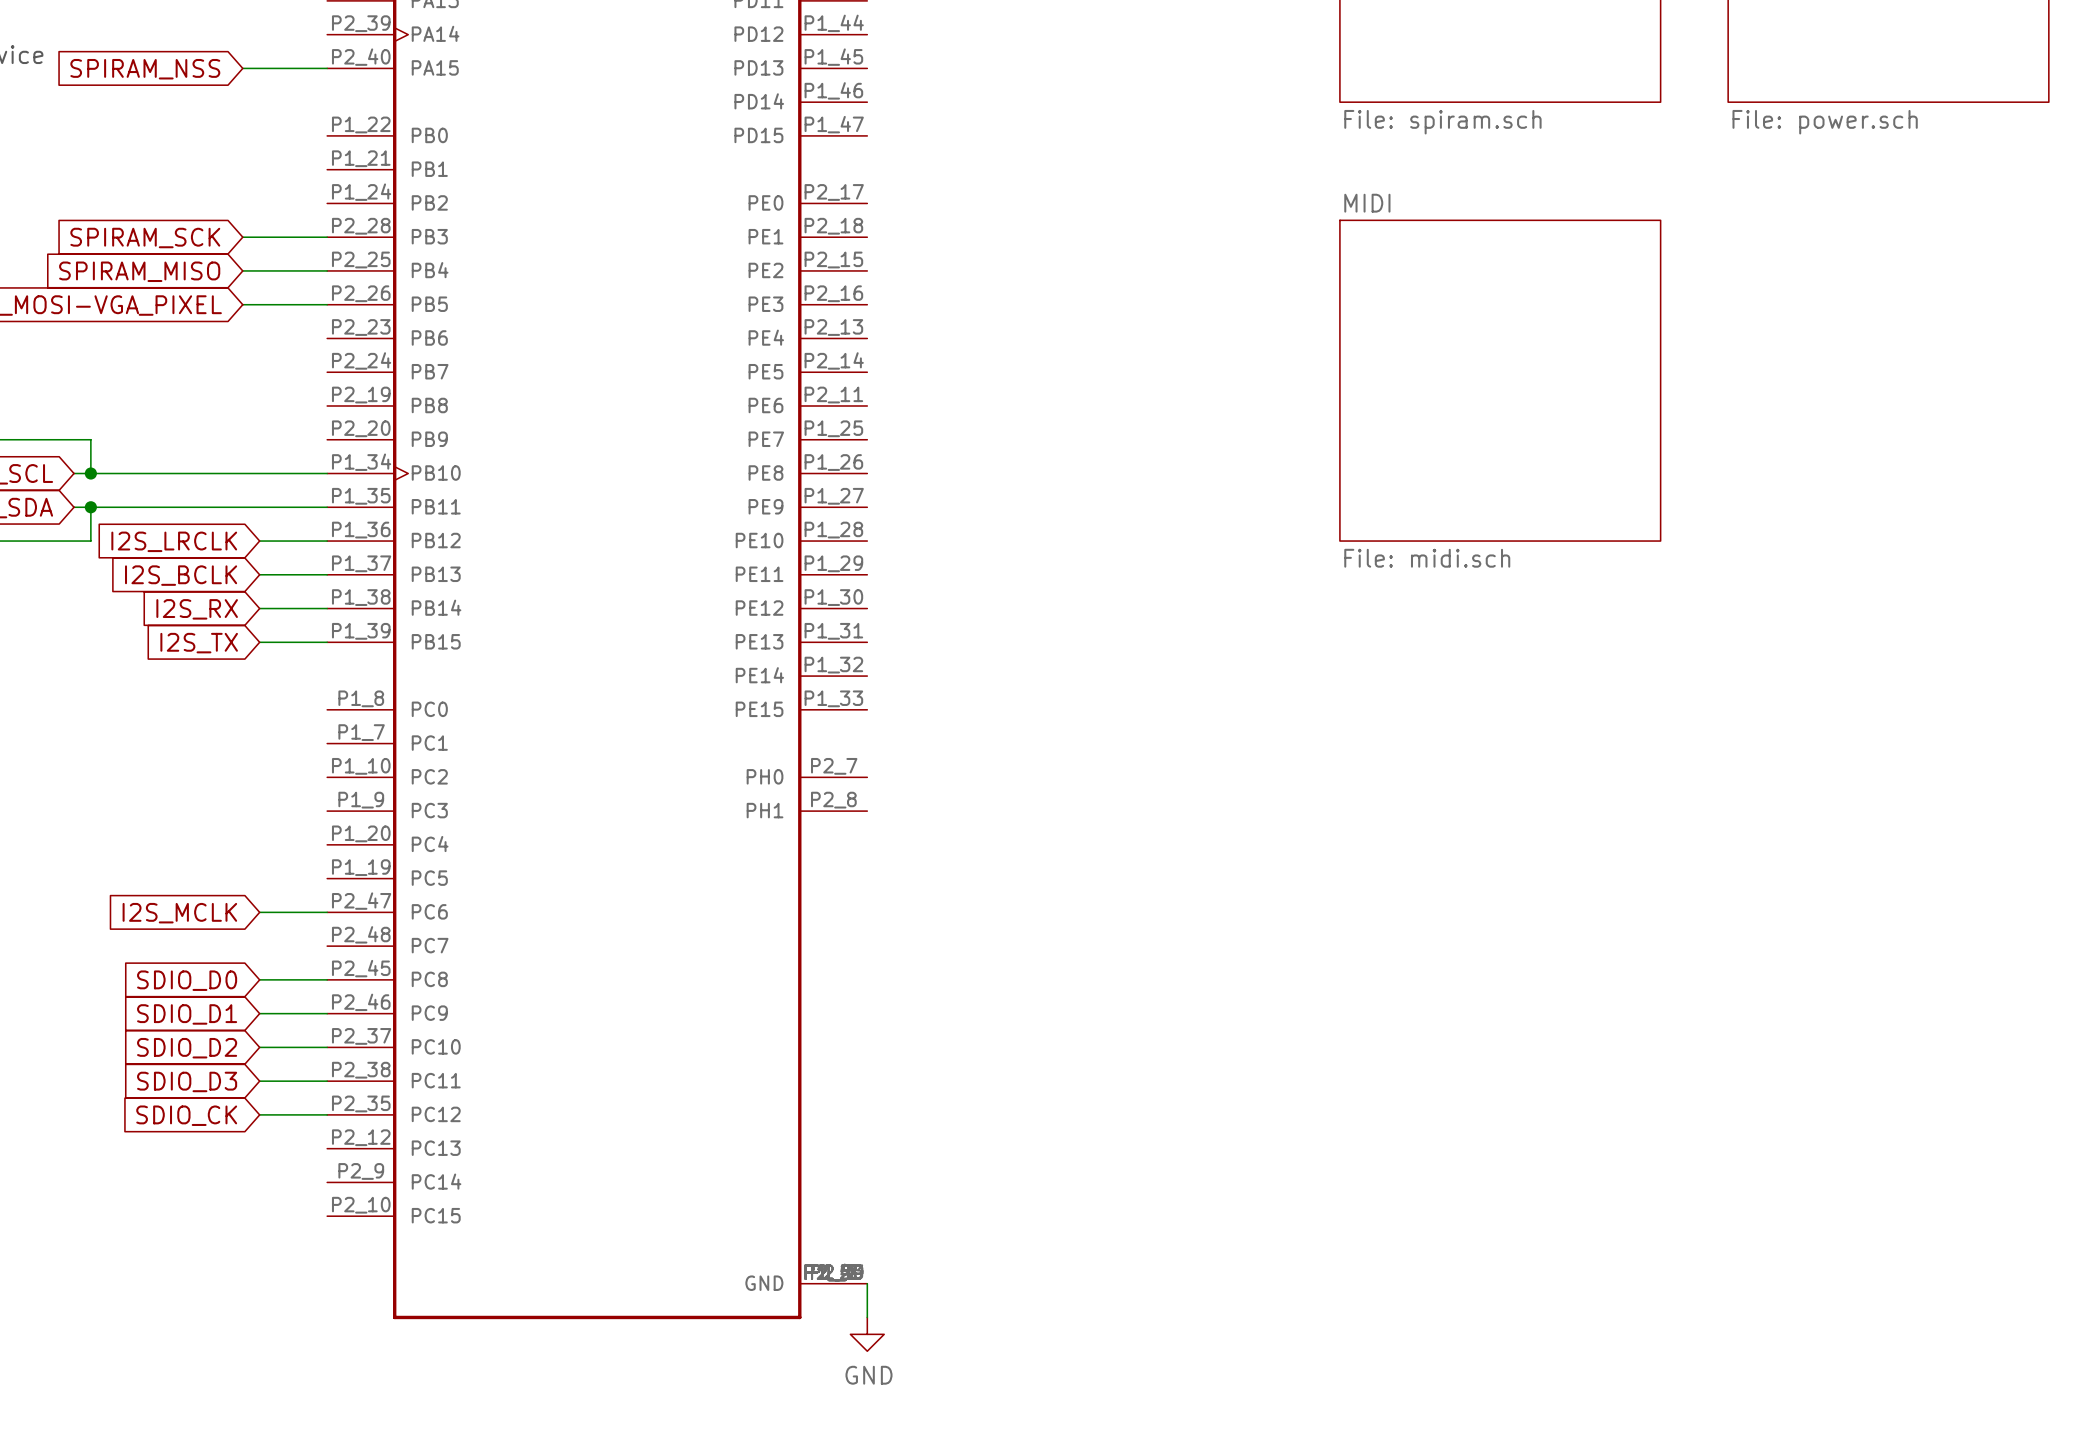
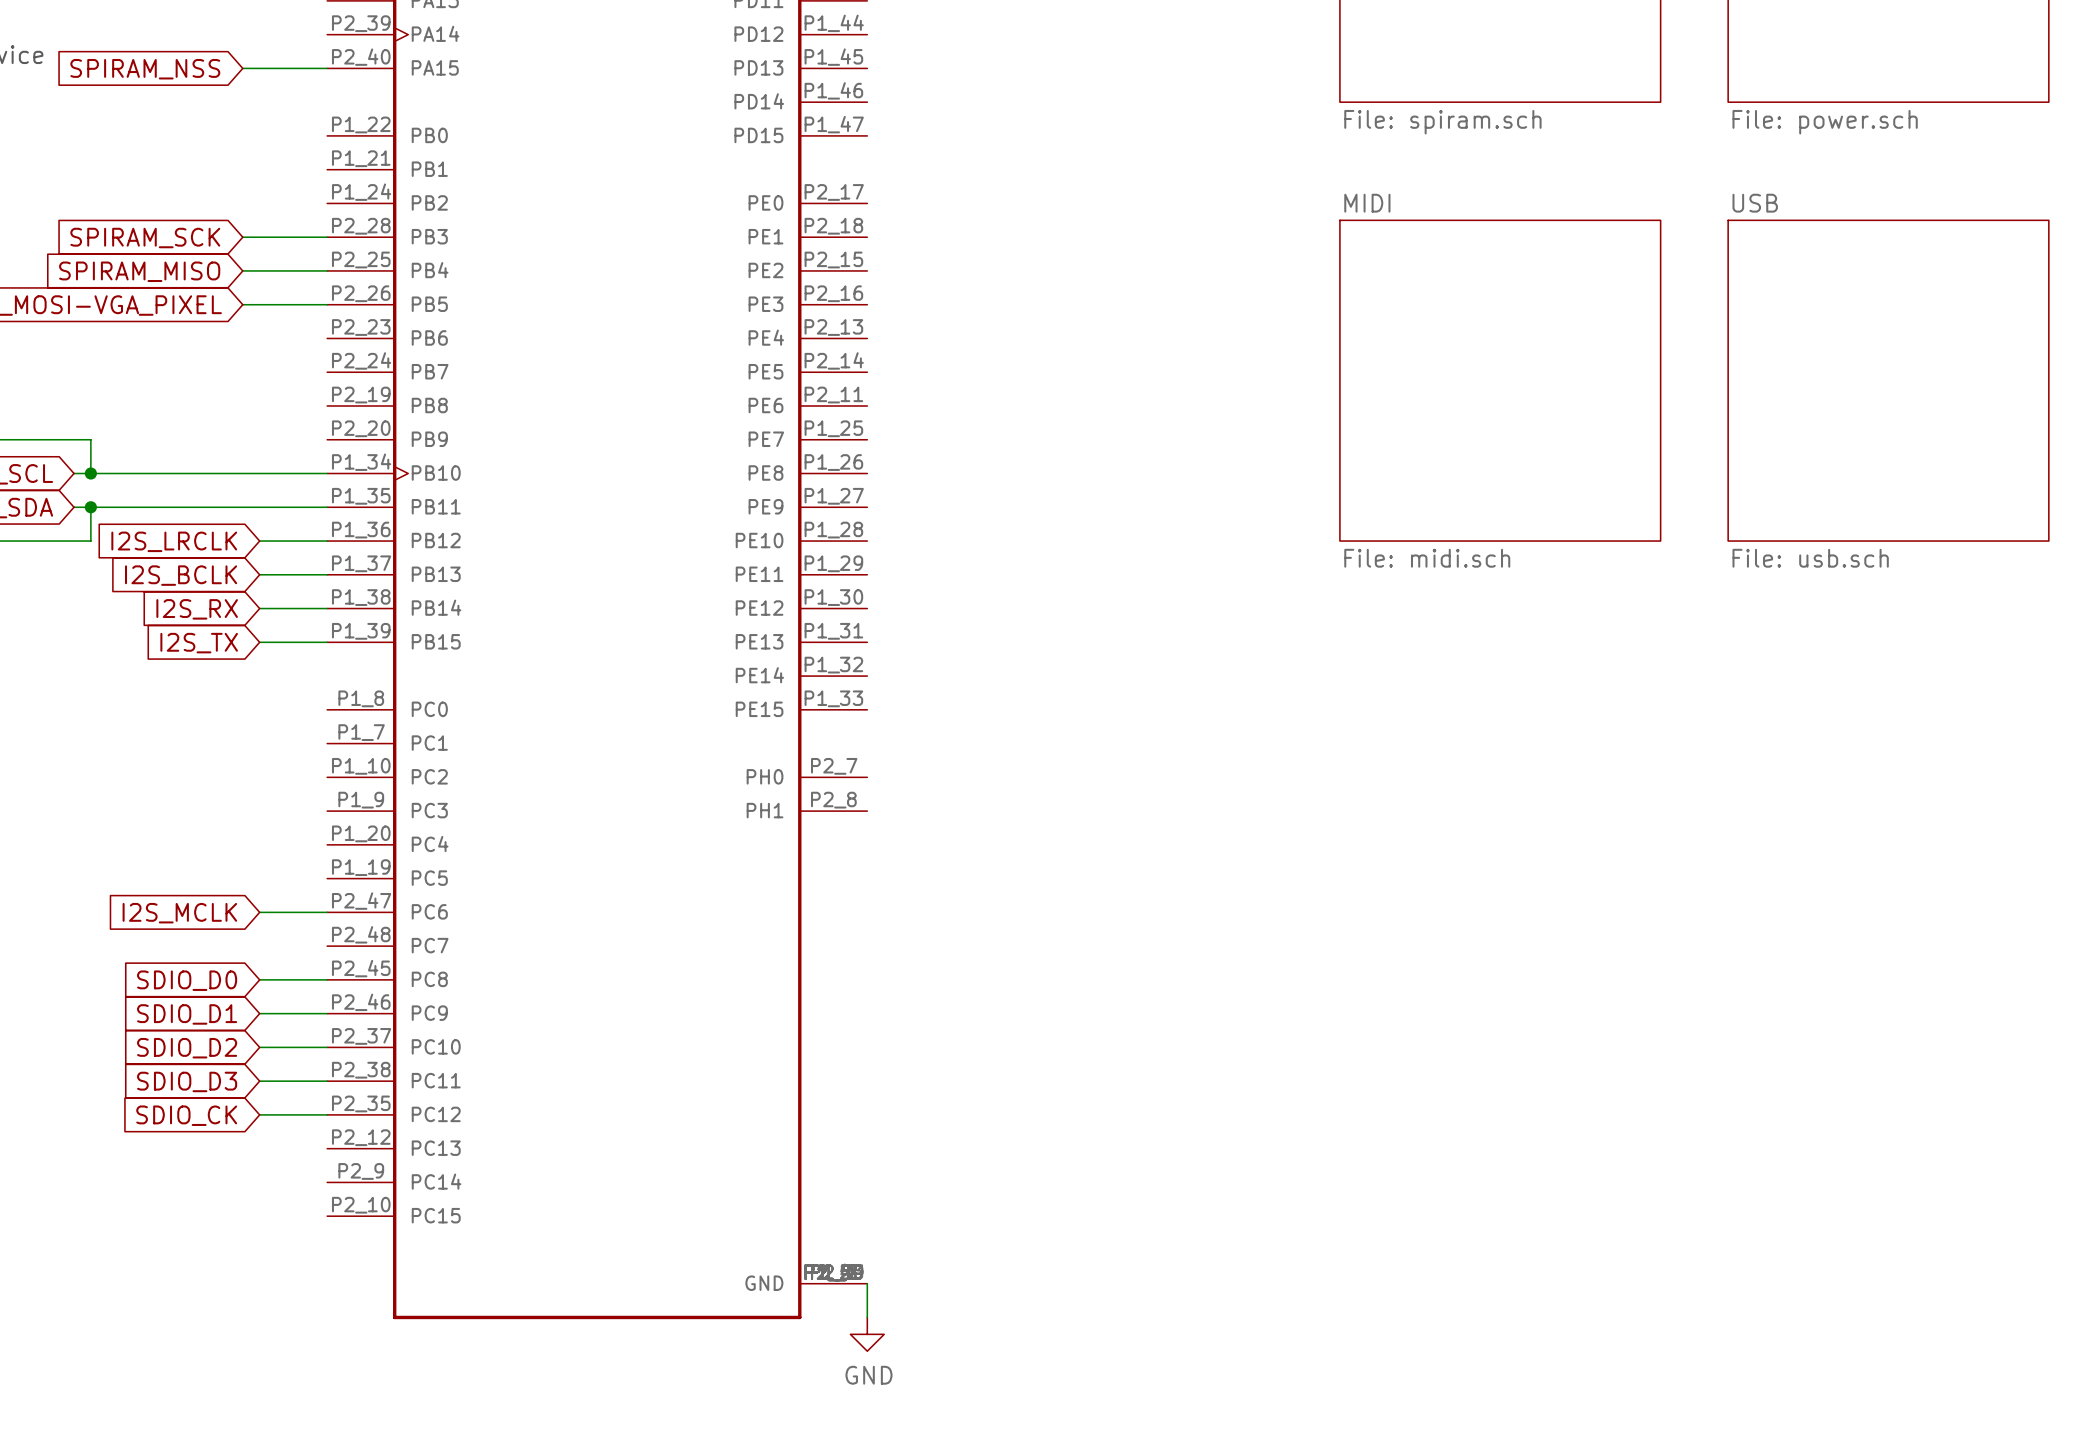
sheet USB: none -> File: usb.sch (1888, 380)

